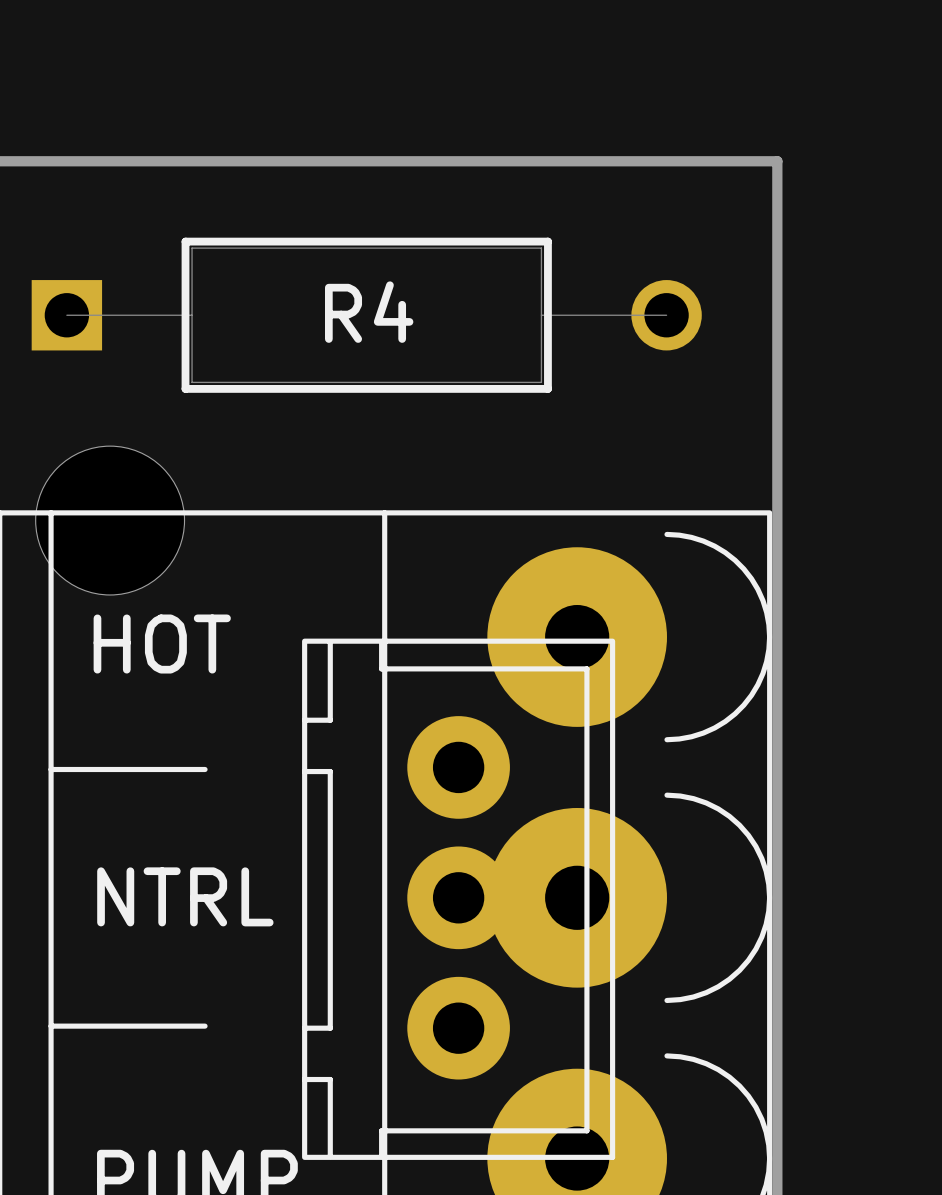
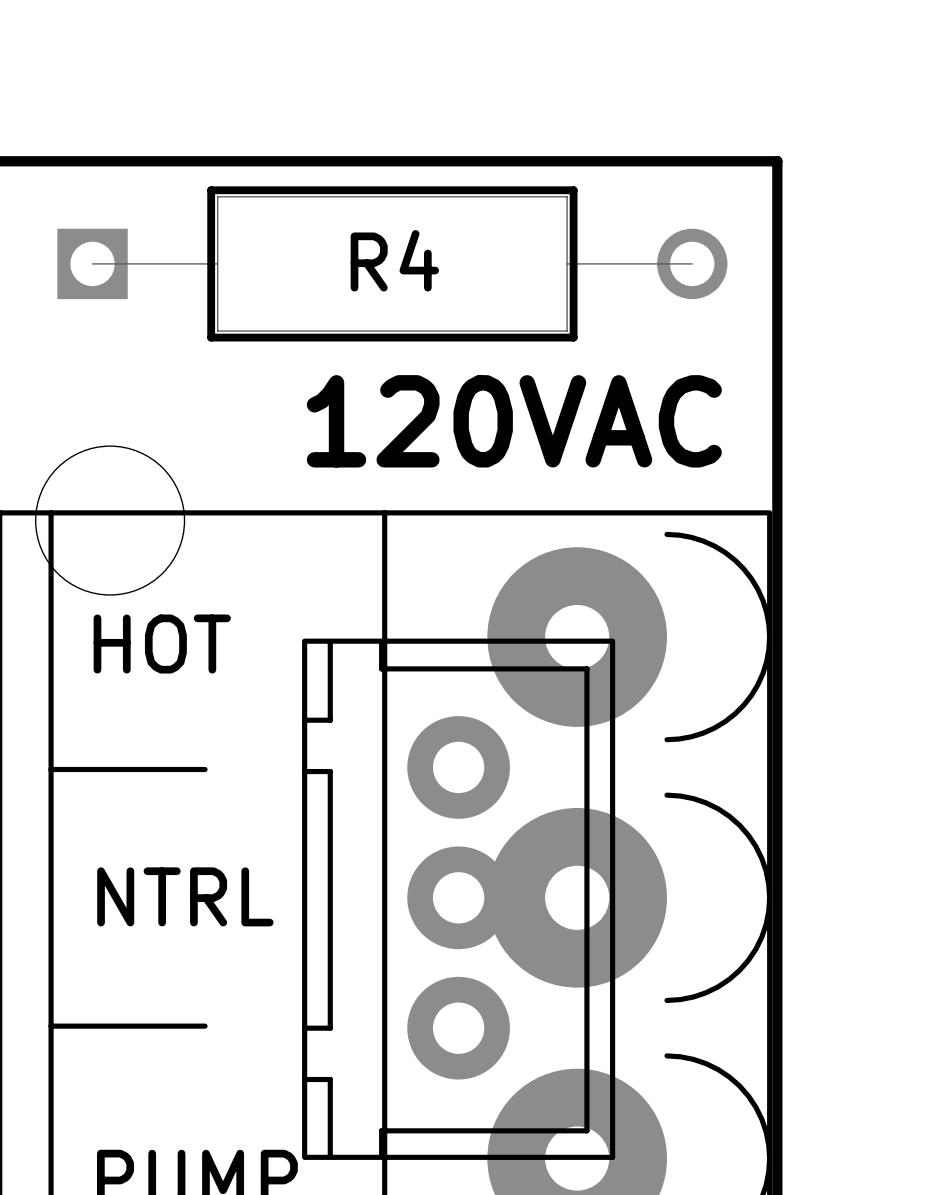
R4 position: (366, 315) -> (392, 263)
text: none -> 120VAC (514, 421)

